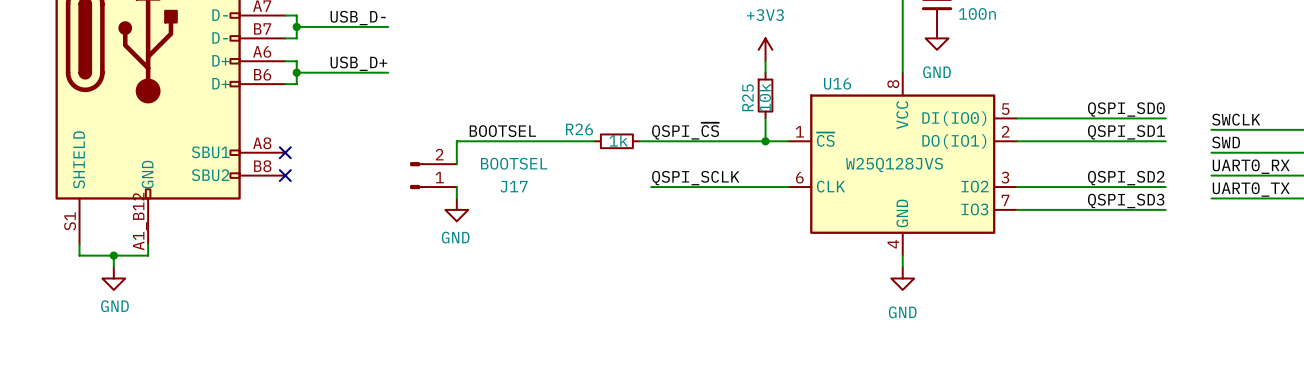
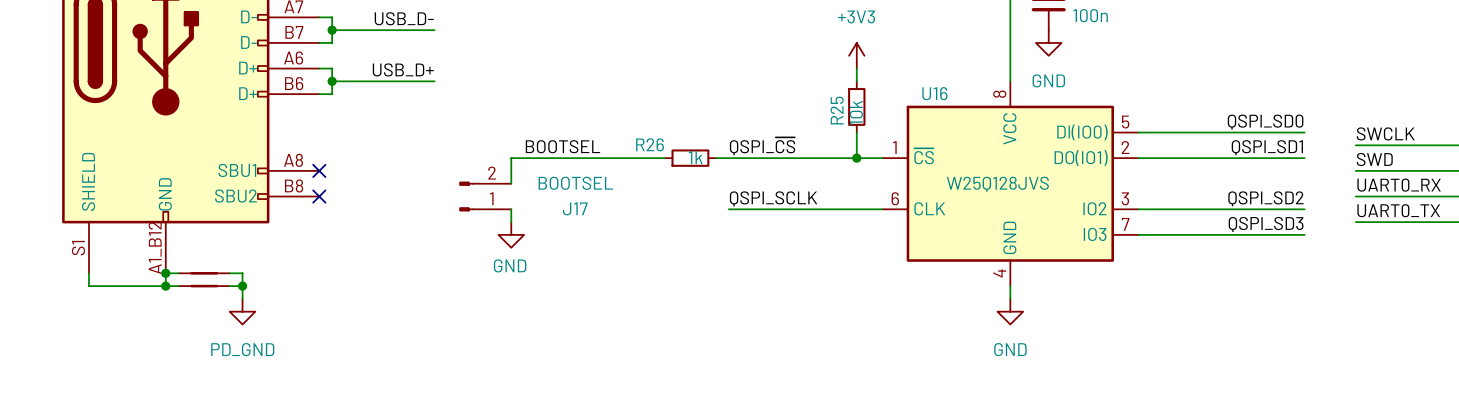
wire: none -> (165, 273) (178, 273)
junction: none -> (165, 273)
part: none -> (204, 273)
wire: none -> (229, 273) (242, 273) (242, 298)
wire: (113, 255) (113, 267) -> none
junction: (113, 255) -> none
wire: none -> (165, 286) (178, 286)
junction: none -> (165, 286)
part: none -> (204, 286)
wire: none -> (229, 286) (242, 286)
junction: none -> (242, 286)
power symbol: GND (113, 278) -> none
power symbol: none -> PD_GND (242, 311)

